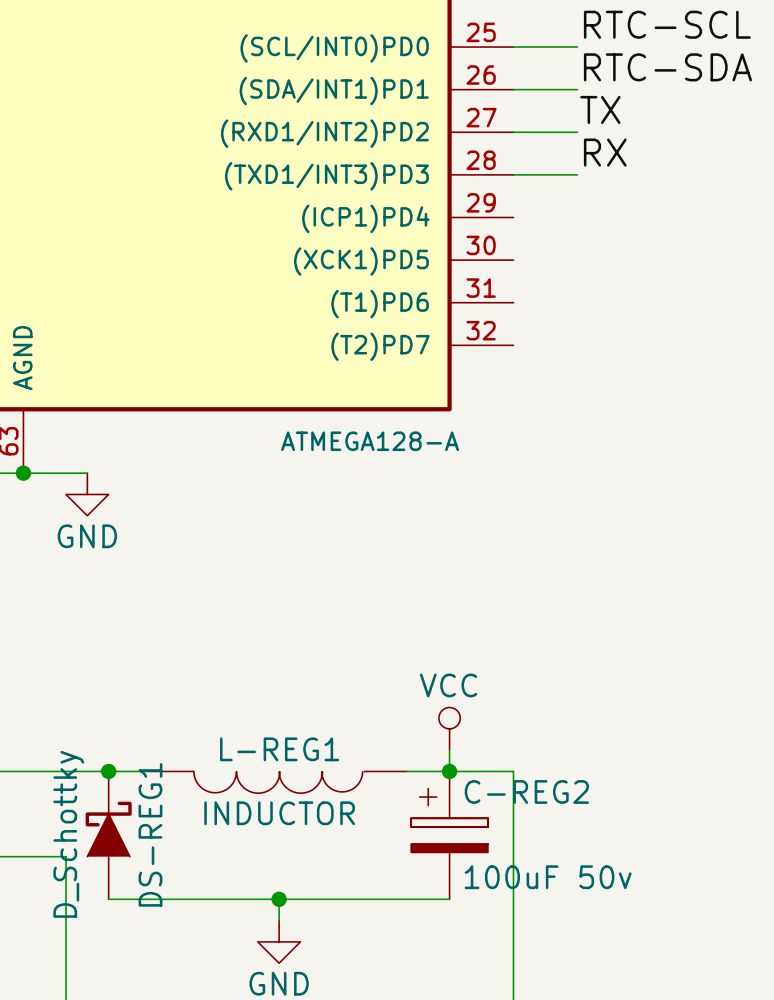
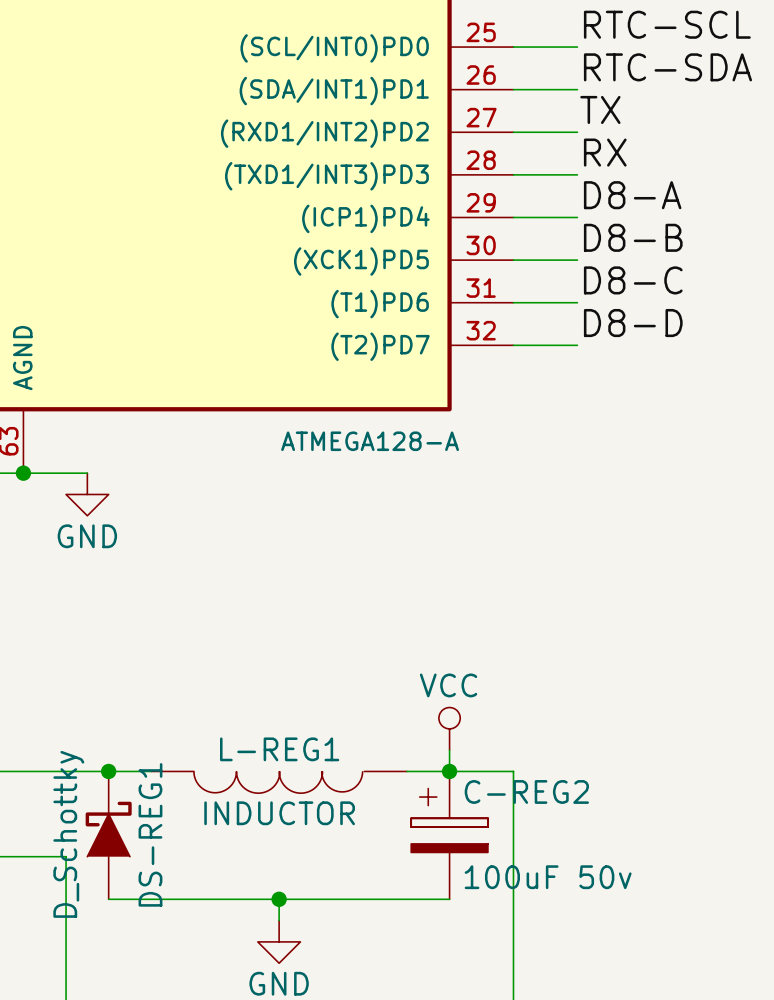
label: none -> D8-A (632, 195)
wire: none -> (513, 217) (577, 217)
label: none -> D8-B (633, 237)
wire: none -> (513, 260) (577, 260)
label: none -> D8-C (633, 280)
wire: none -> (513, 302) (577, 302)
label: none -> D8-D (633, 323)
wire: none -> (513, 345) (577, 345)

